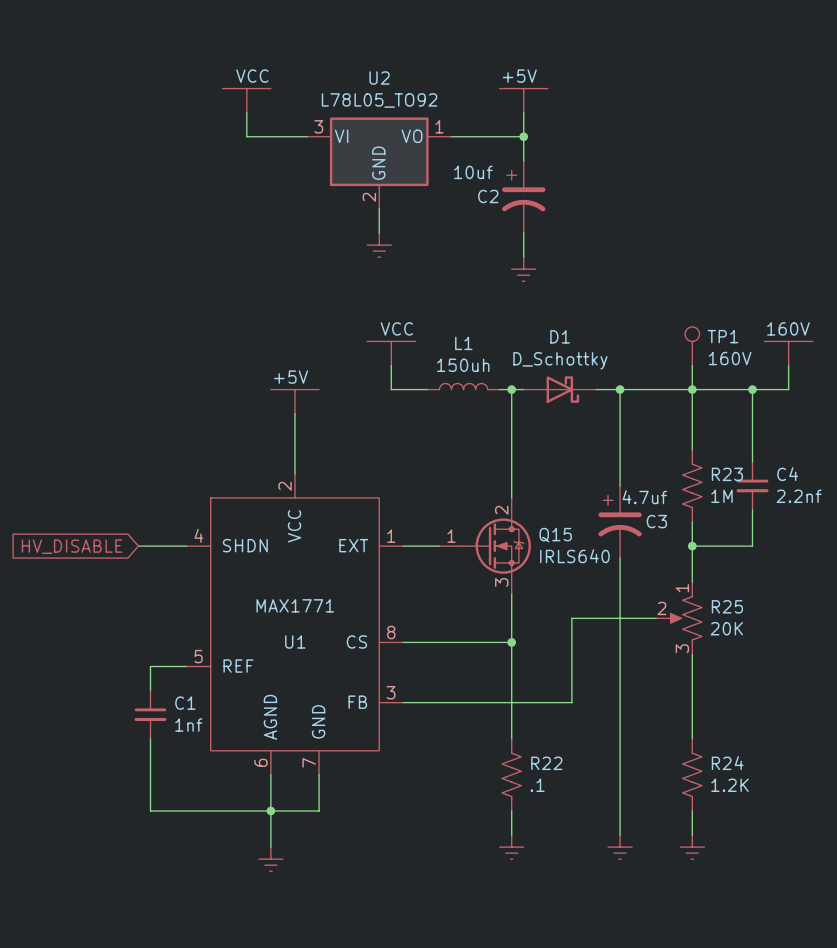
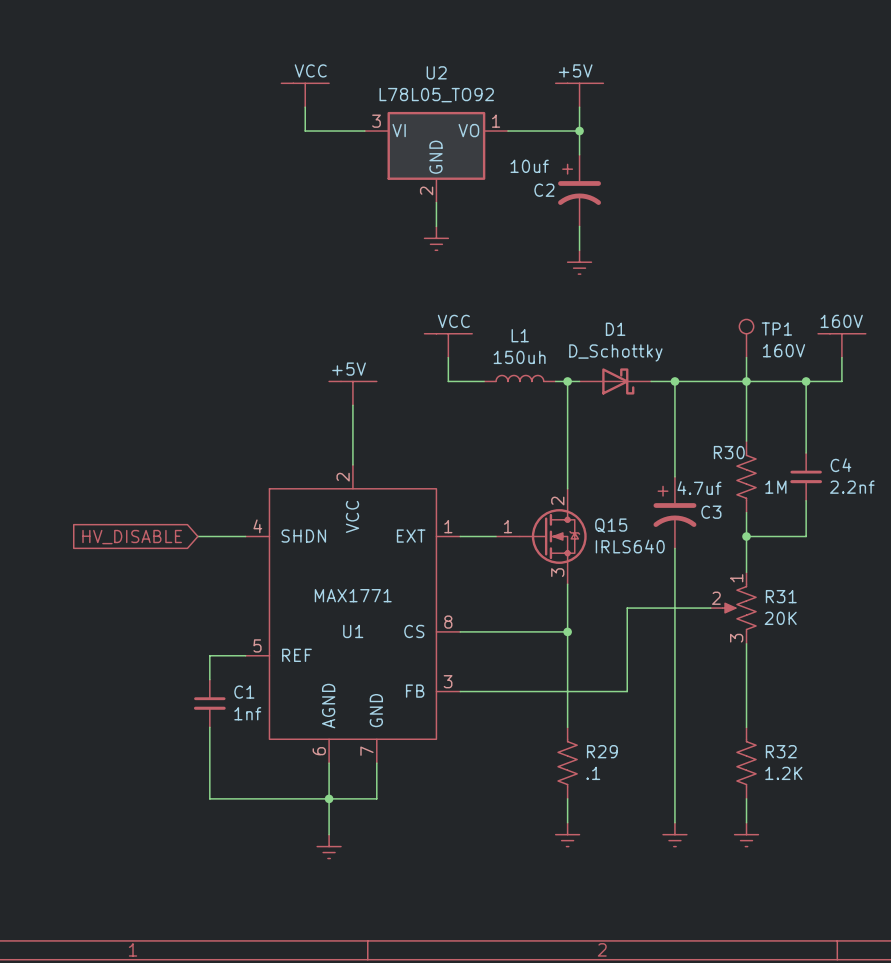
R23 name: R23 (727, 474) -> R30 (729, 452)
R25 name: R25 (727, 606) -> R31 (781, 596)
R22 name: R22 (546, 763) -> R29 (602, 751)
R24 name: R24 (727, 763) -> R32 (781, 751)

